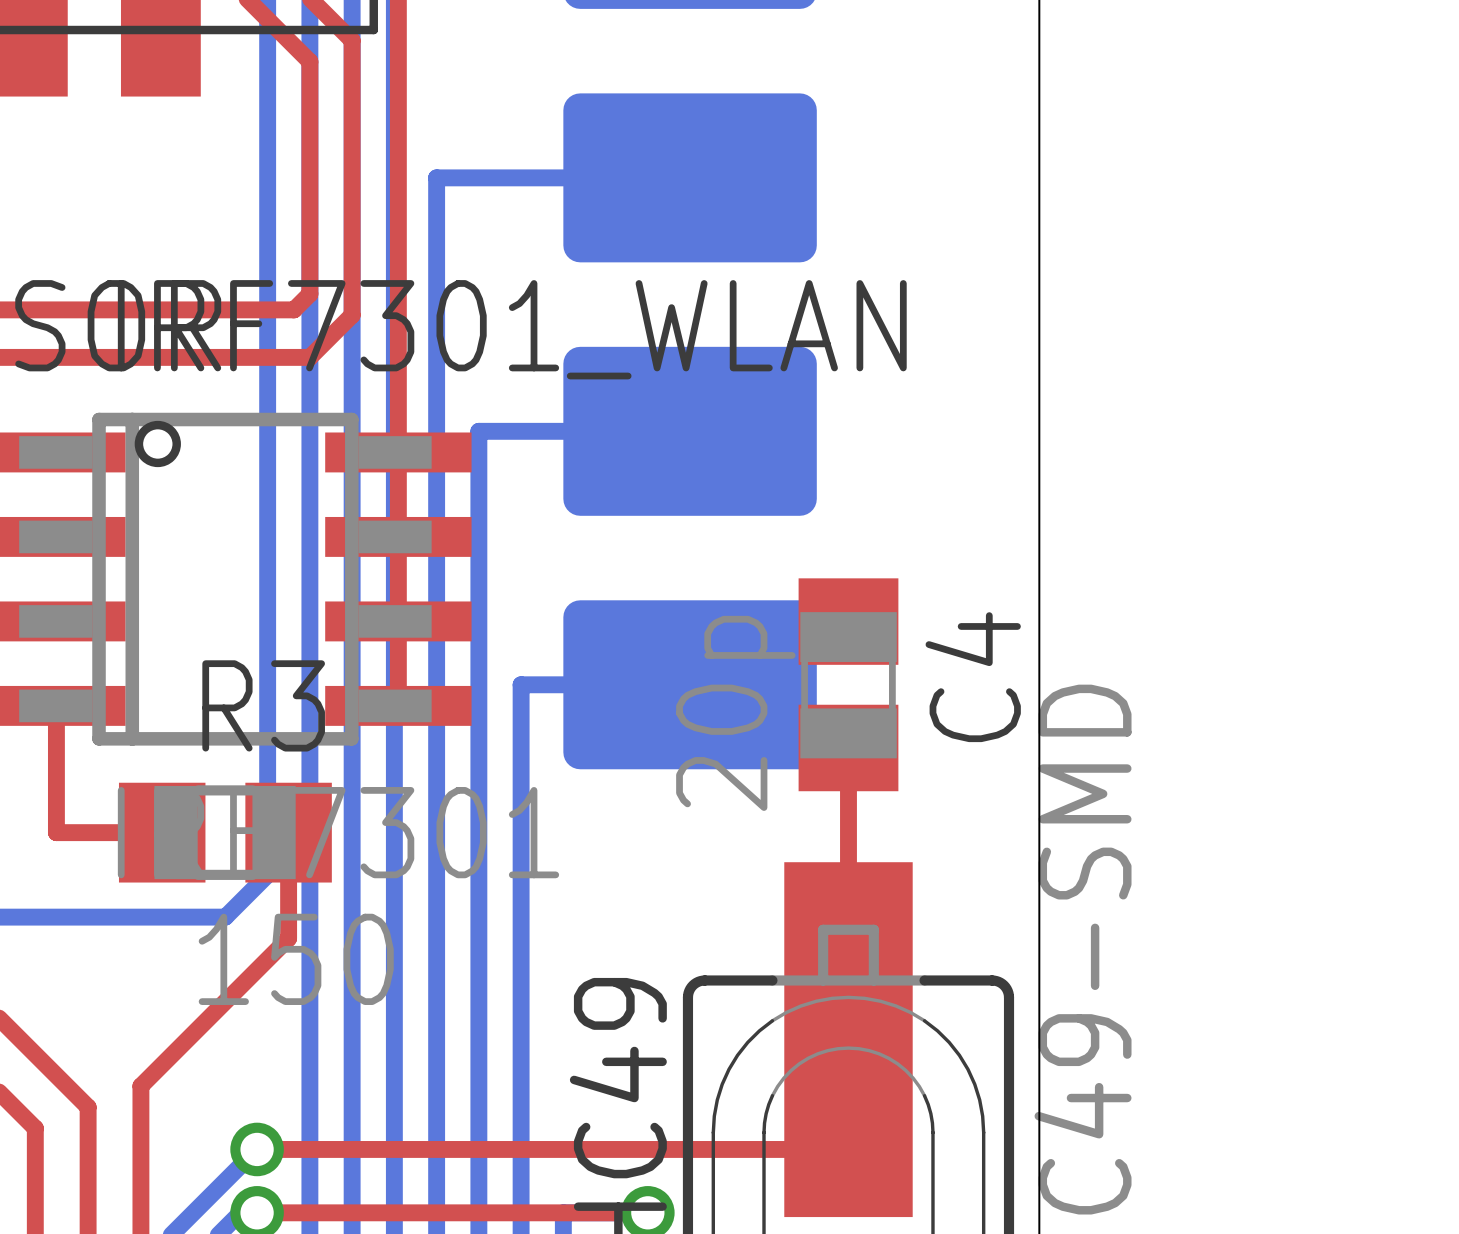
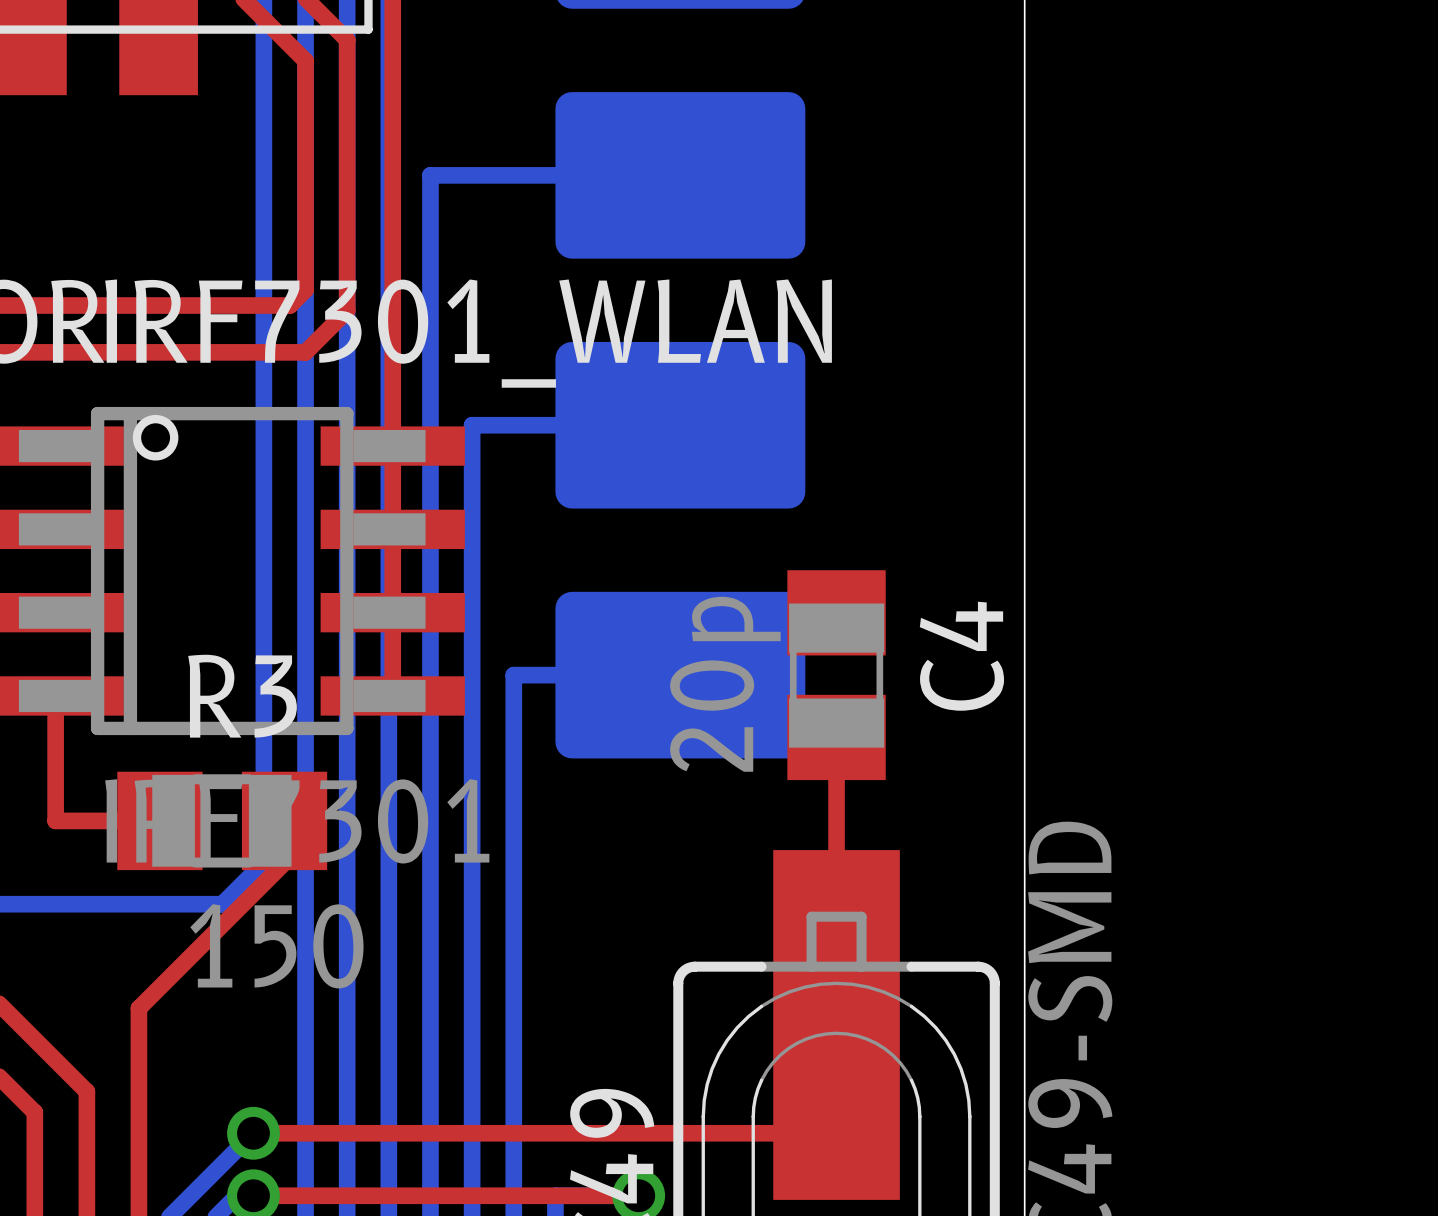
top track: (288, 875) (288, 938) (140, 1086) -> (284, 862) (138, 1008) (138, 1070)

